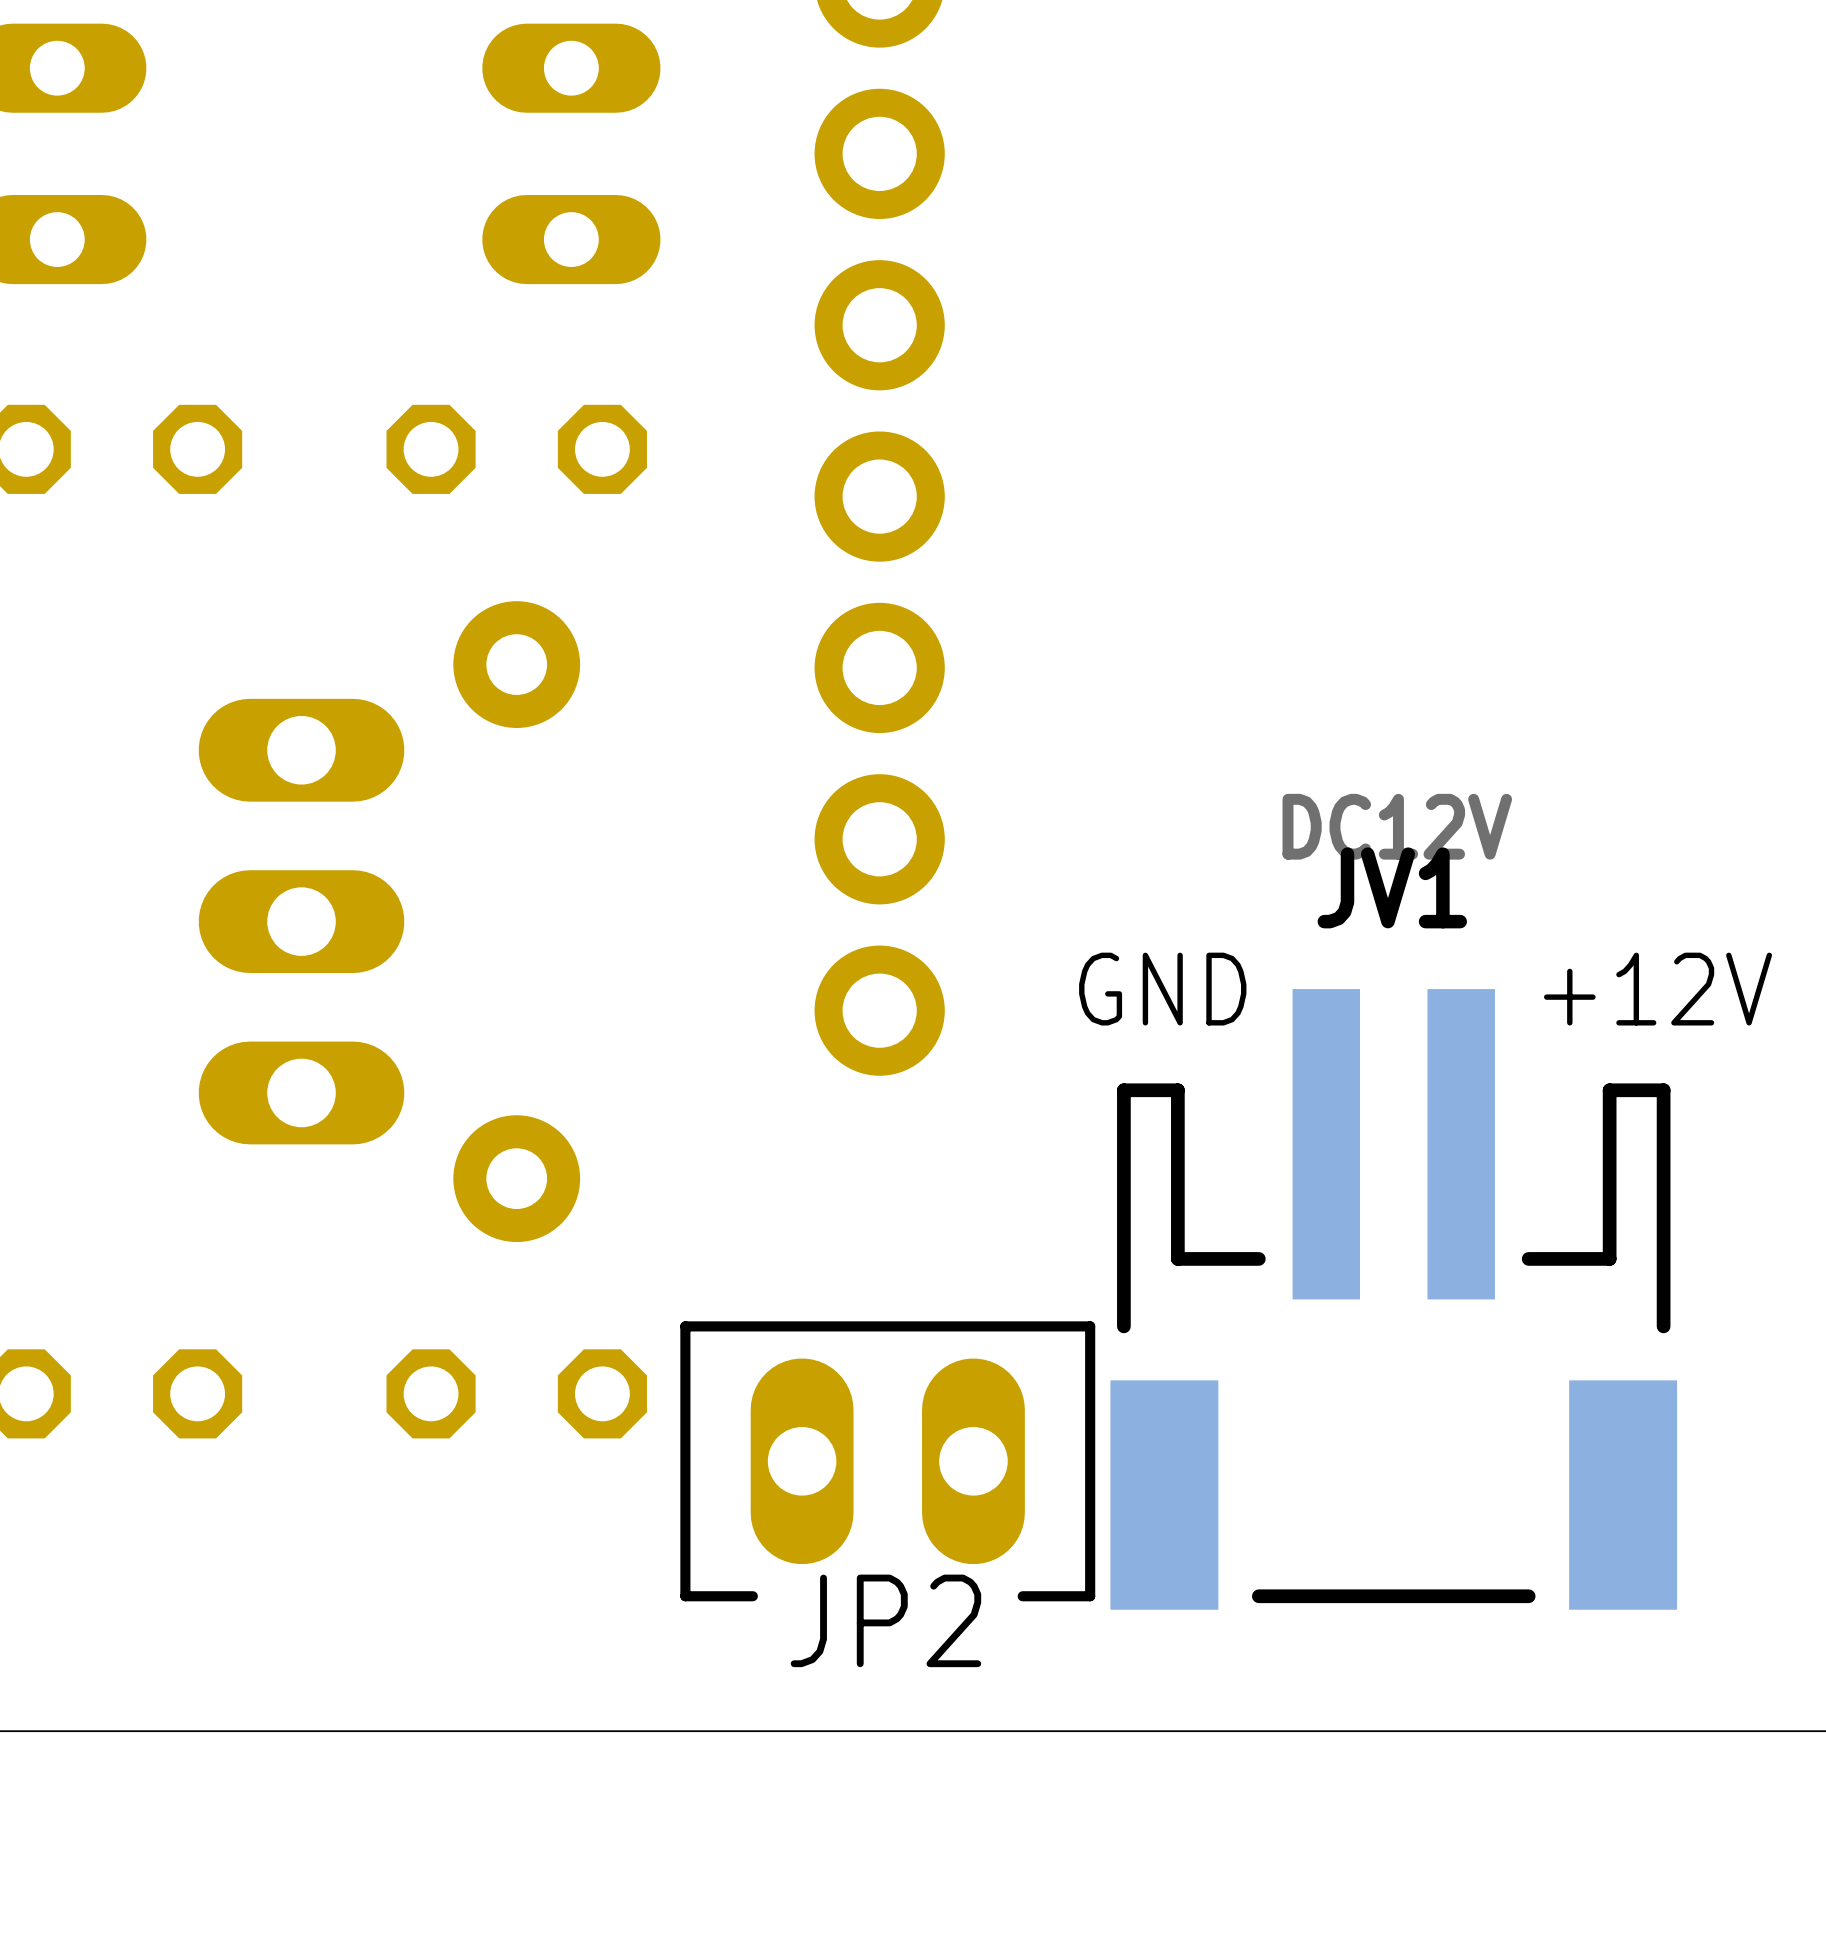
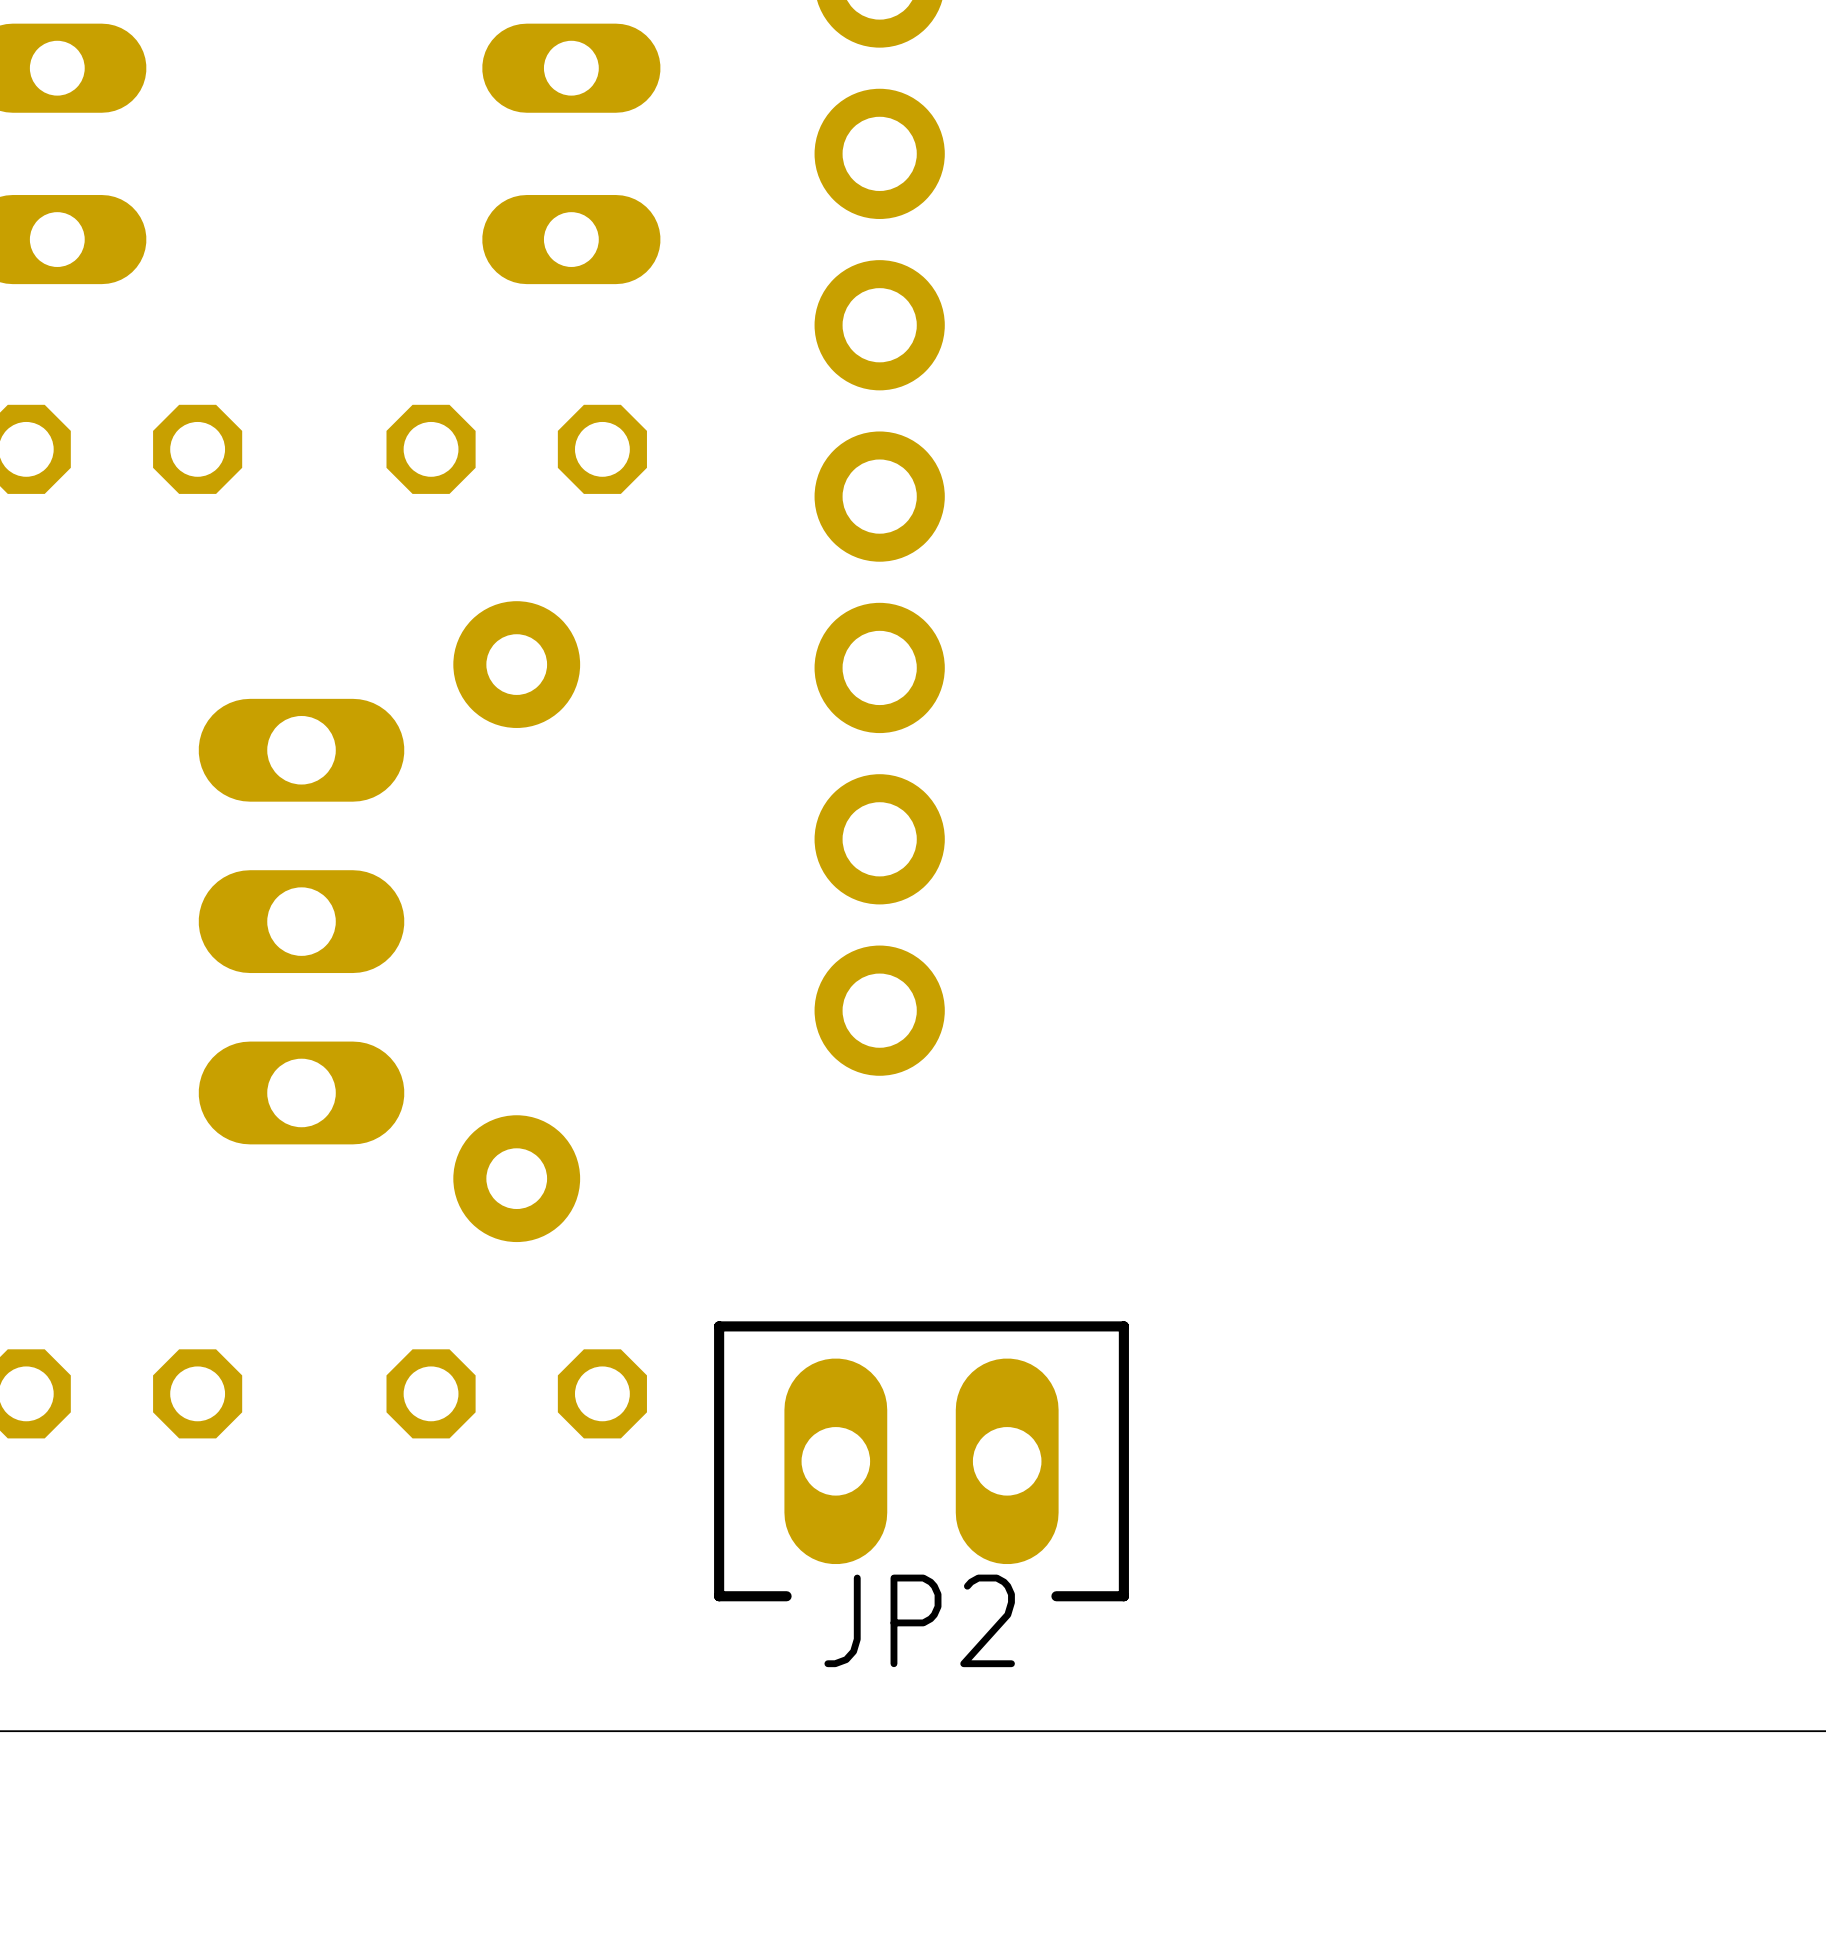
text: GND (1162, 989) -> none
text: +12V (1658, 989) -> none
JV1: DC12V (1393, 1299) -> none
line: (719, 1326) (685, 1326) (685, 1596) (719, 1596) -> (719, 1326) (719, 1596)
line: (1090, 1326) (1090, 1596) -> (1090, 1326) (1123, 1326) (1123, 1596) (1090, 1596)
part position: (887, 1461) -> (921, 1461)
line: (1056, 1596) (1022, 1596) -> (786, 1596) (752, 1596)
text position: JP2 (885, 1620) -> JP2 (919, 1620)

